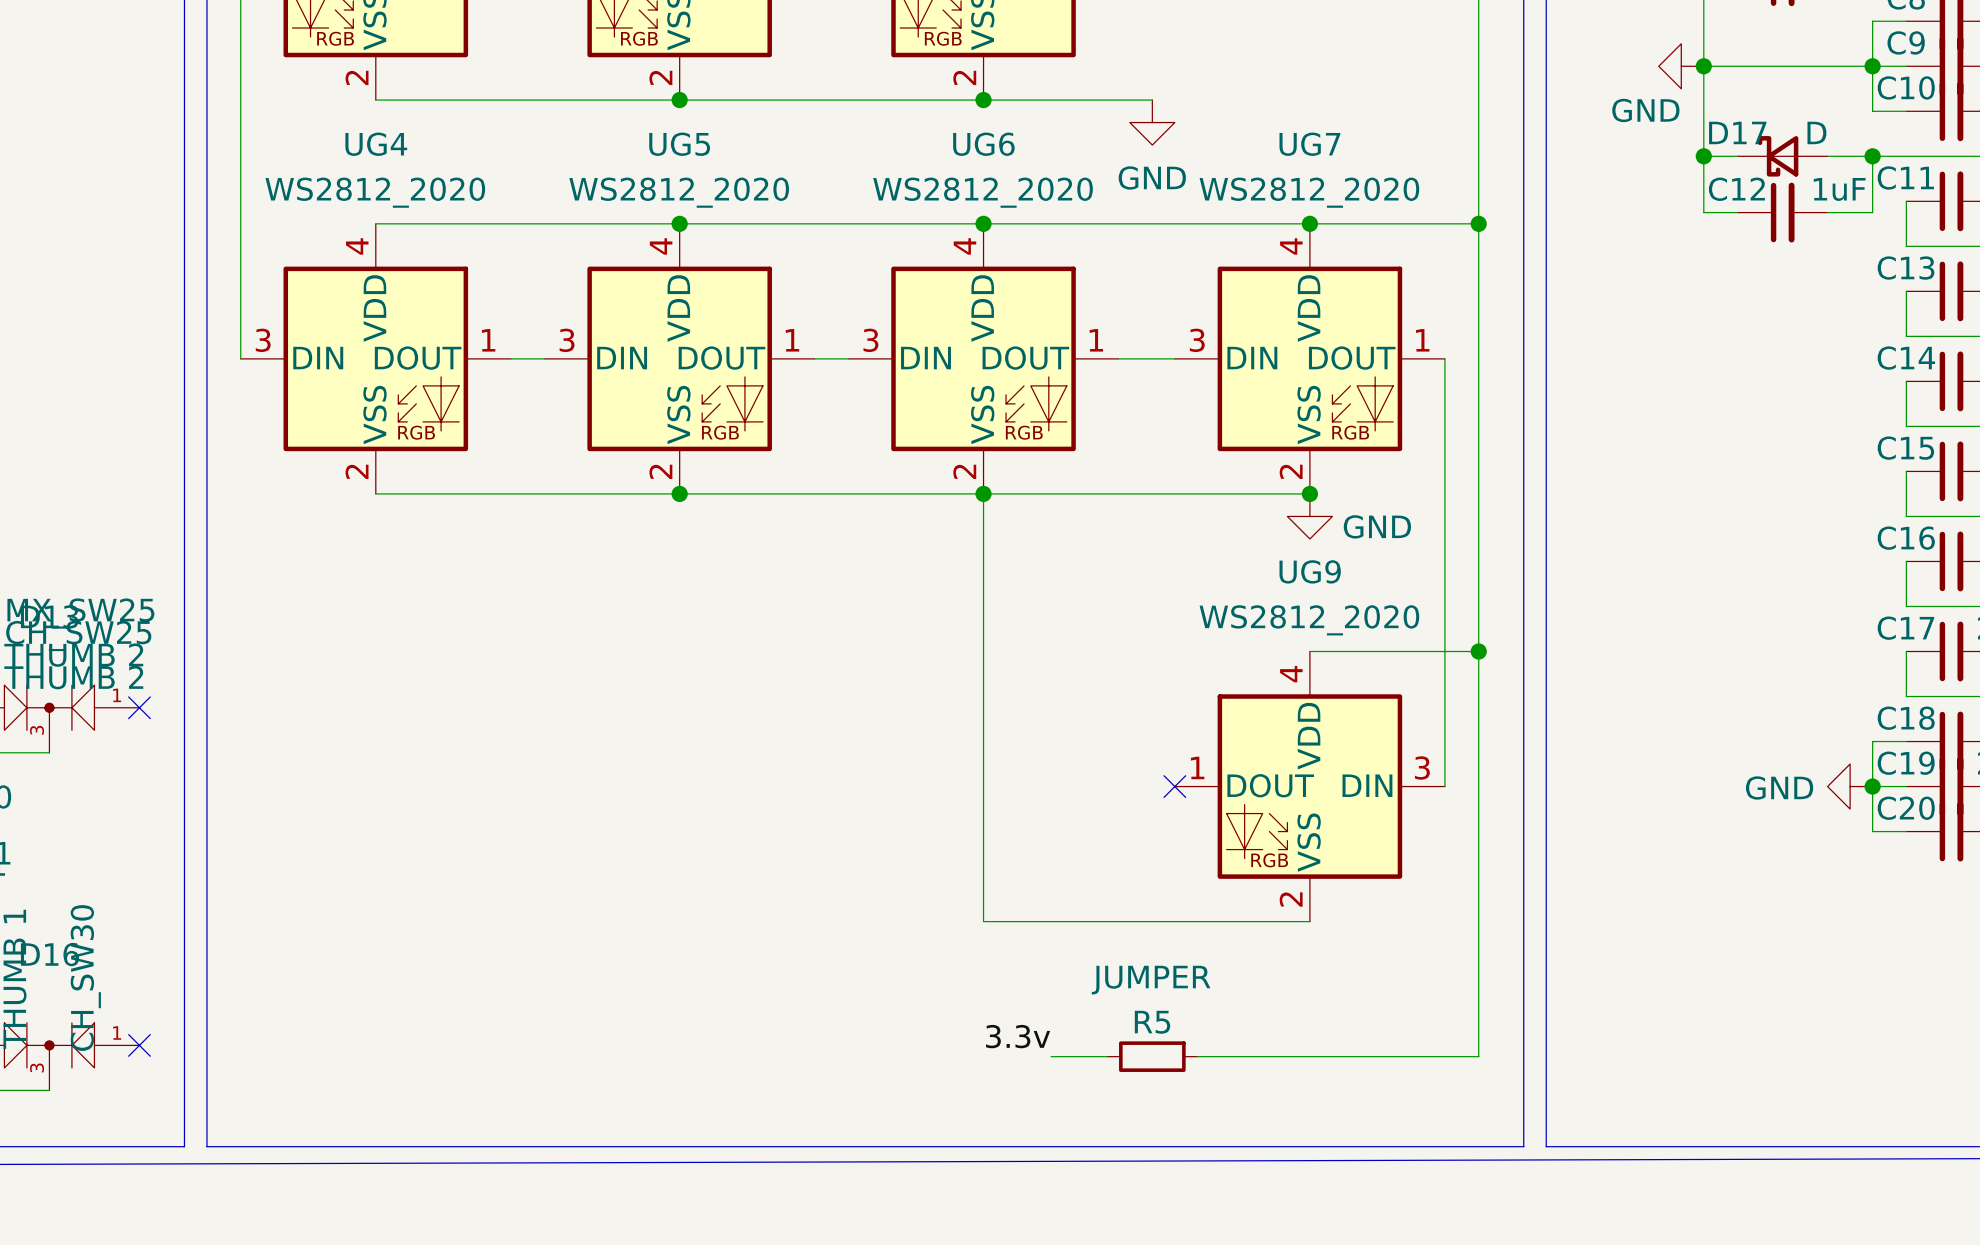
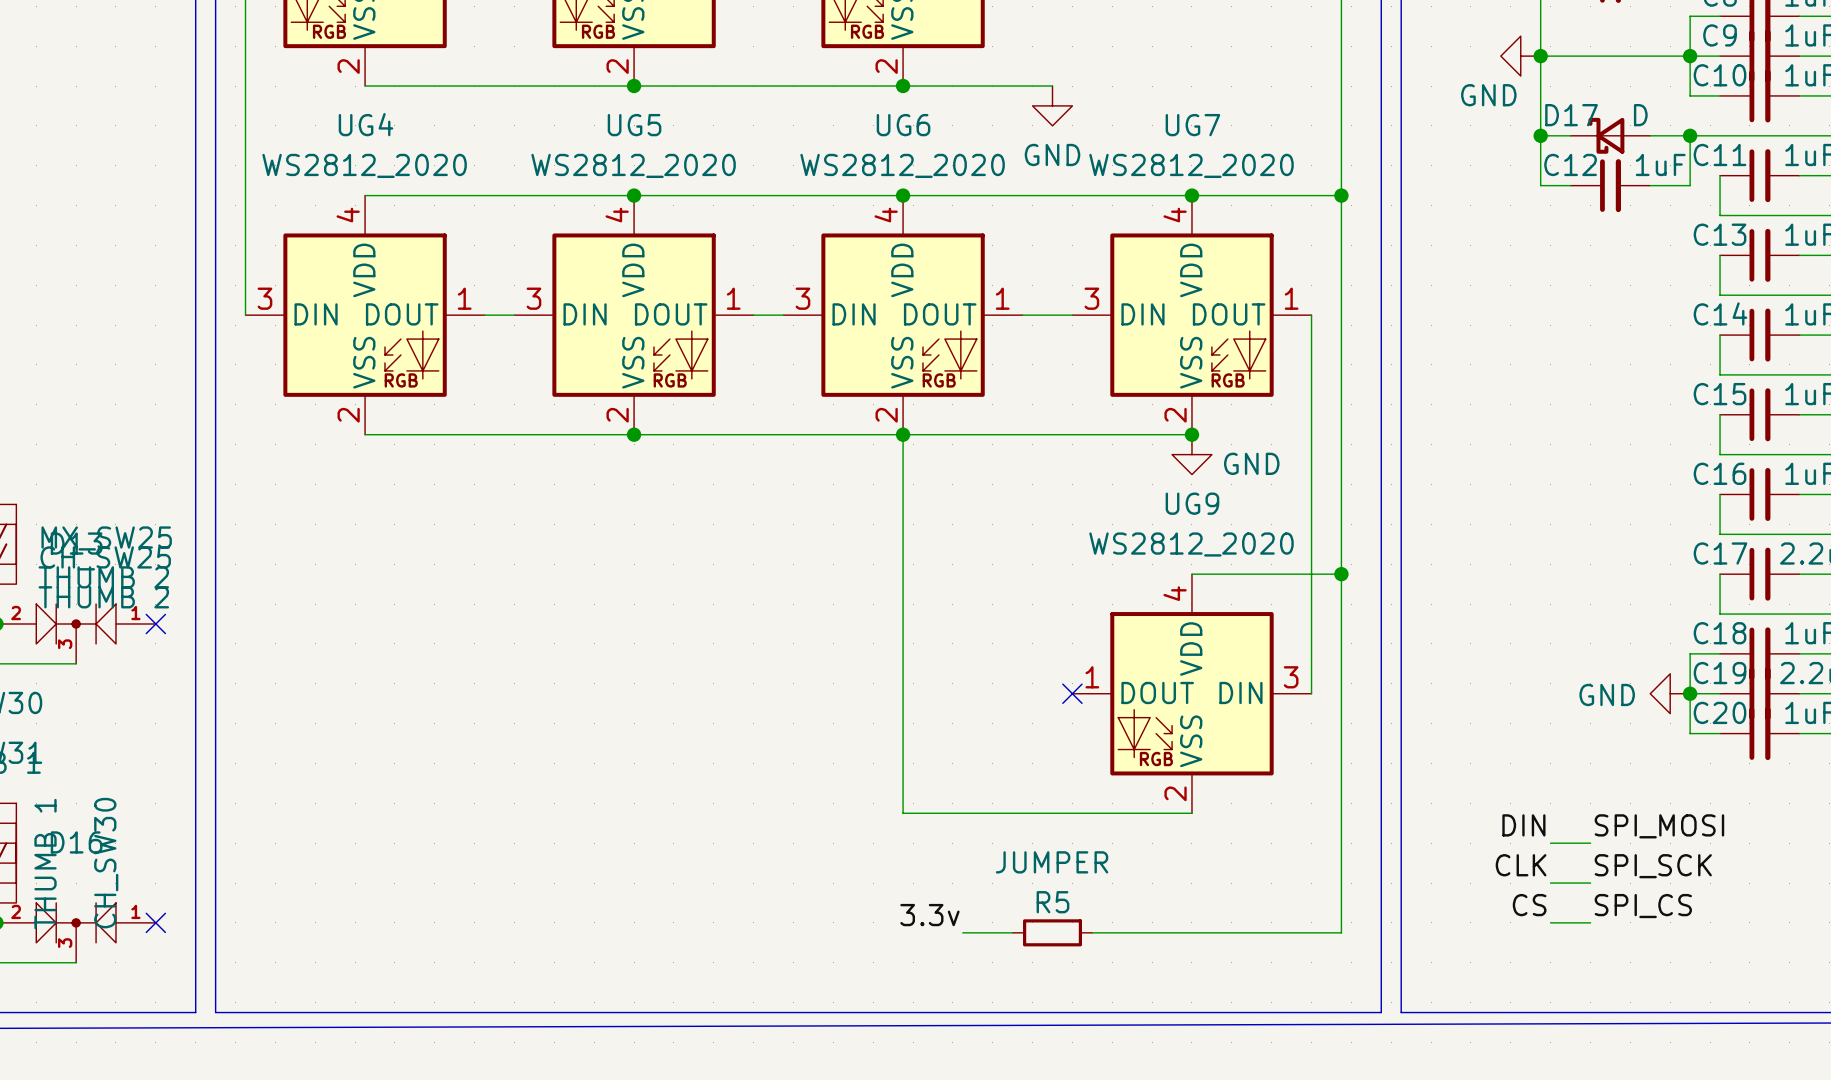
label: none -> DIN (1523, 825)
label: none -> SPI_MOSI (1659, 826)
wire: none -> (1550, 843) (1590, 843)
label: none -> CLK (1521, 865)
label: none -> SPI_SCK (1653, 866)
wire: none -> (1550, 883) (1590, 883)
label: none -> CS (1529, 905)
label: none -> SPI_CS (1643, 906)
wire: none -> (1550, 922) (1590, 922)

